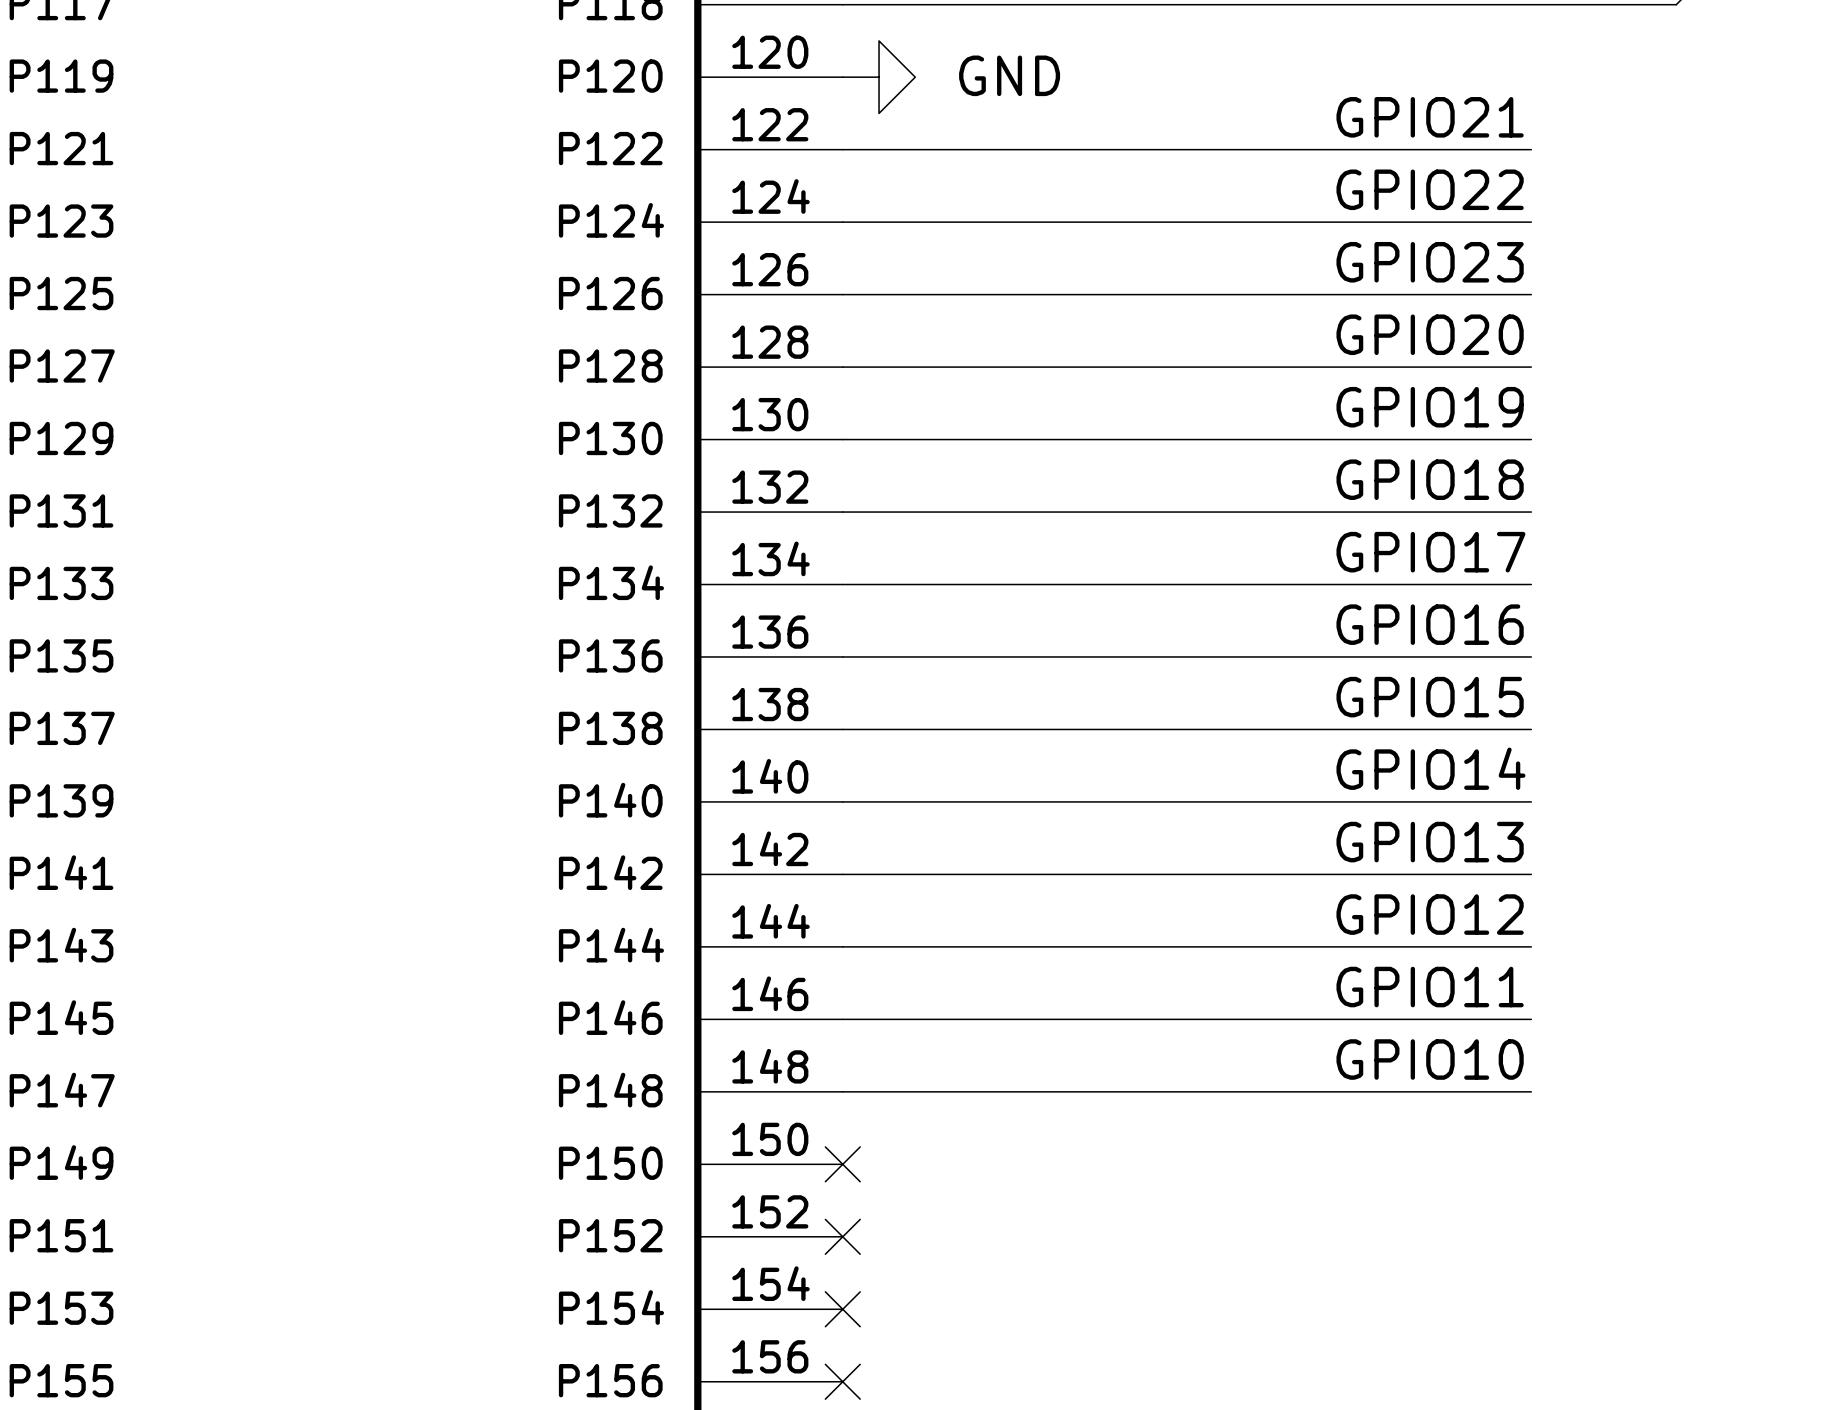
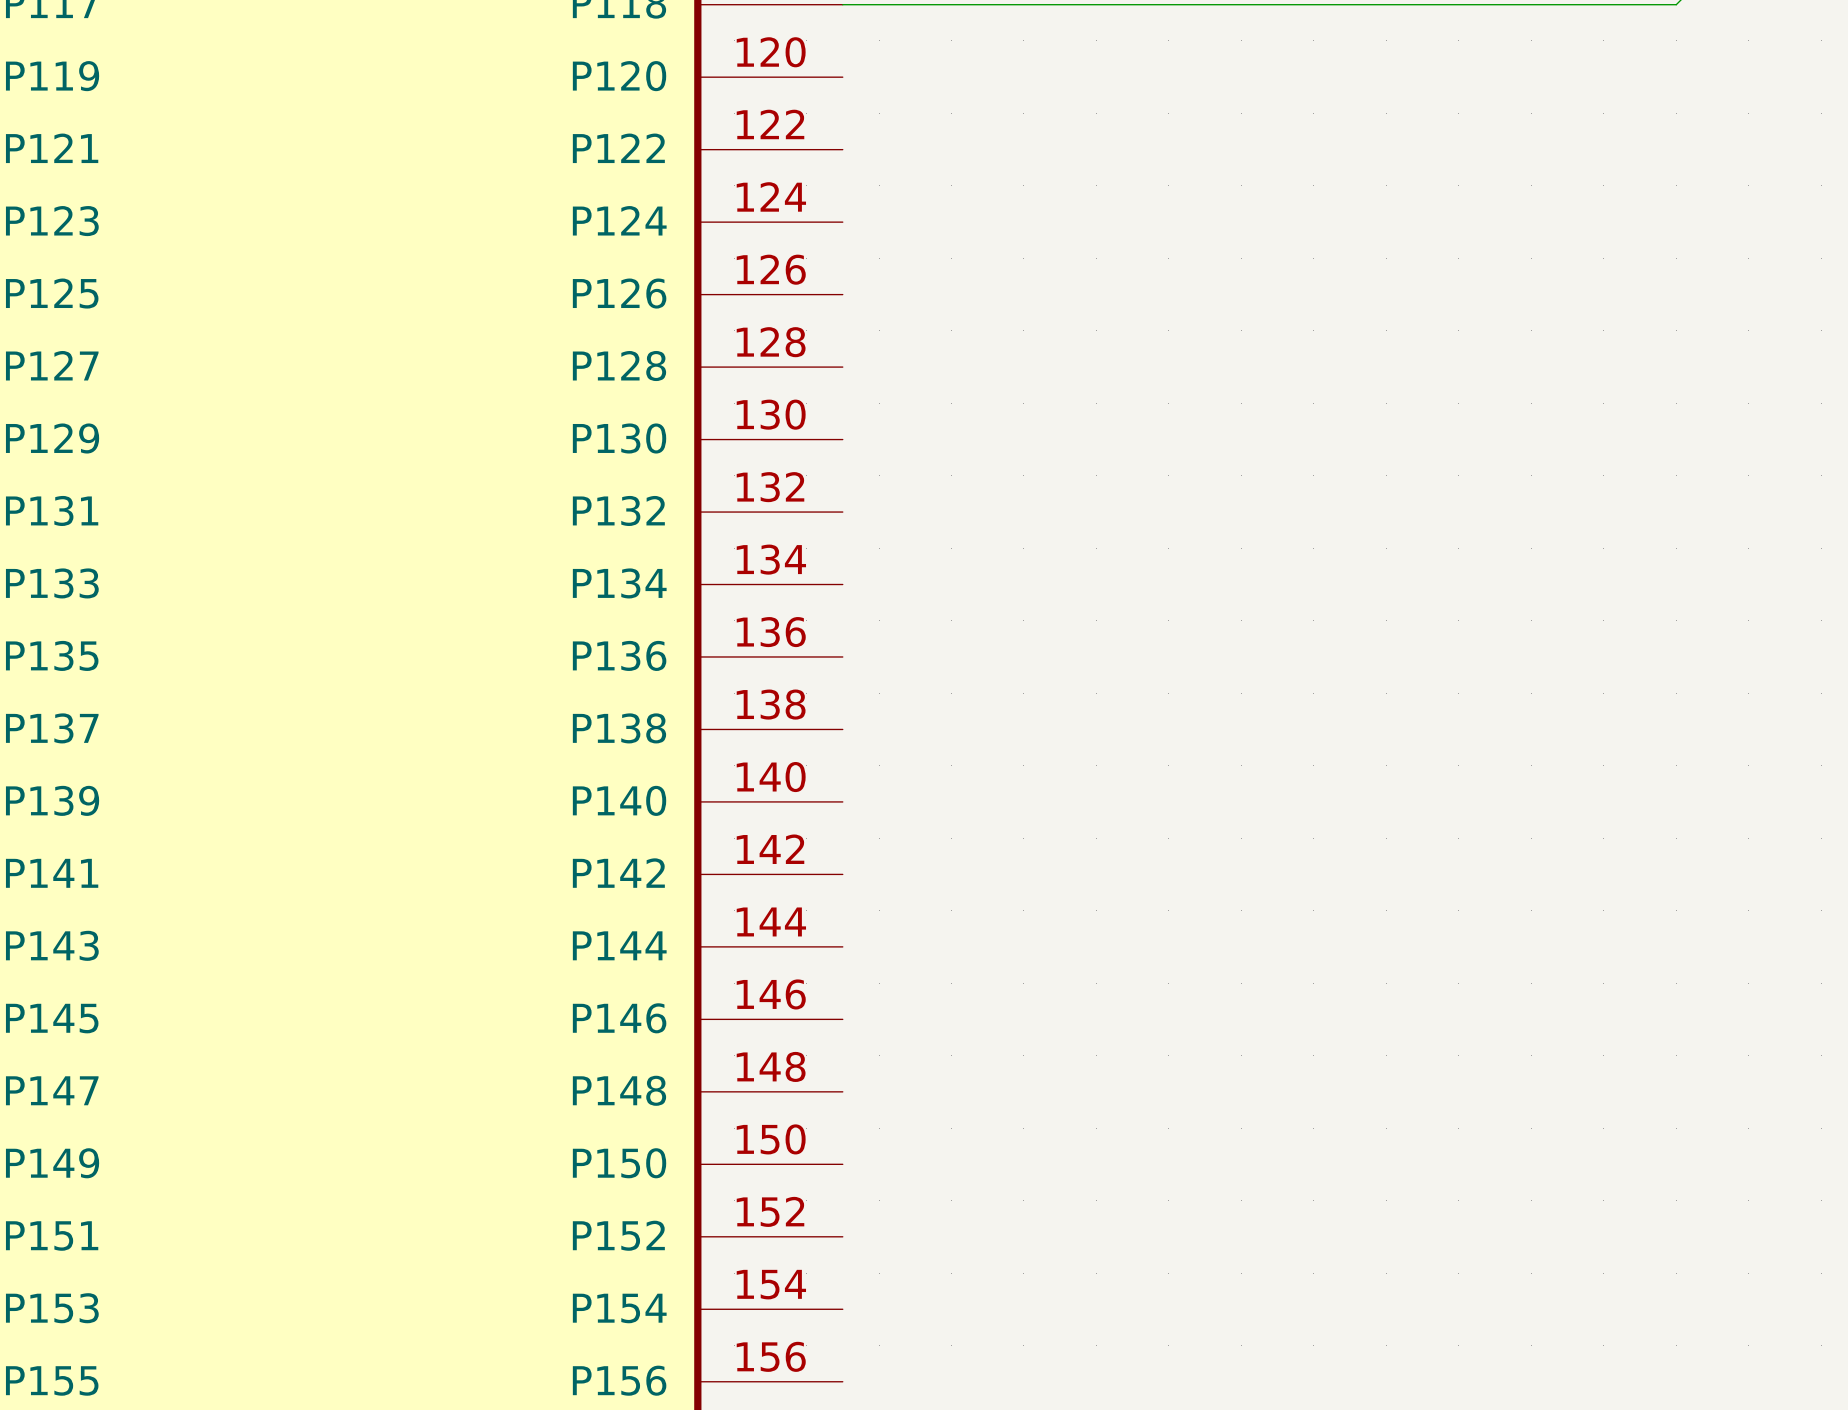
power symbol: GND (879, 77) -> none
label: GPIO21 (1430, 117) -> none
wire: (842, 149) (1531, 149) -> none
label: GPIO22 (1430, 189) -> none
wire: (842, 222) (1531, 222) -> none
label: GPIO23 (1430, 262) -> none
wire: (842, 294) (1531, 294) -> none
label: GPIO20 (1430, 334) -> none
wire: (842, 367) (1531, 367) -> none
label: GPIO19 (1430, 407) -> none
wire: (842, 439) (1531, 439) -> none
label: GPIO18 (1430, 479) -> none
wire: (842, 512) (1531, 512) -> none
label: GPIO17 (1430, 552) -> none
wire: (842, 584) (1531, 584) -> none
label: GPIO16 (1430, 624) -> none
wire: (842, 656) (1531, 656) -> none
label: GPIO15 (1430, 697) -> none
wire: (842, 729) (1531, 729) -> none
label: GPIO14 (1430, 768) -> none
wire: (842, 801) (1531, 801) -> none
label: GPIO13 (1430, 842) -> none
wire: (842, 874) (1531, 874) -> none
label: GPIO12 (1430, 914) -> none
wire: (842, 946) (1531, 946) -> none
label: GPIO11 (1430, 987) -> none
wire: (842, 1019) (1531, 1019) -> none
label: GPIO10 (1430, 1059) -> none
wire: (842, 1091) (1531, 1091) -> none
no-connect mark: (842, 1164) -> none
no-connect mark: (842, 1236) -> none
no-connect mark: (842, 1309) -> none
no-connect mark: (842, 1381) -> none

